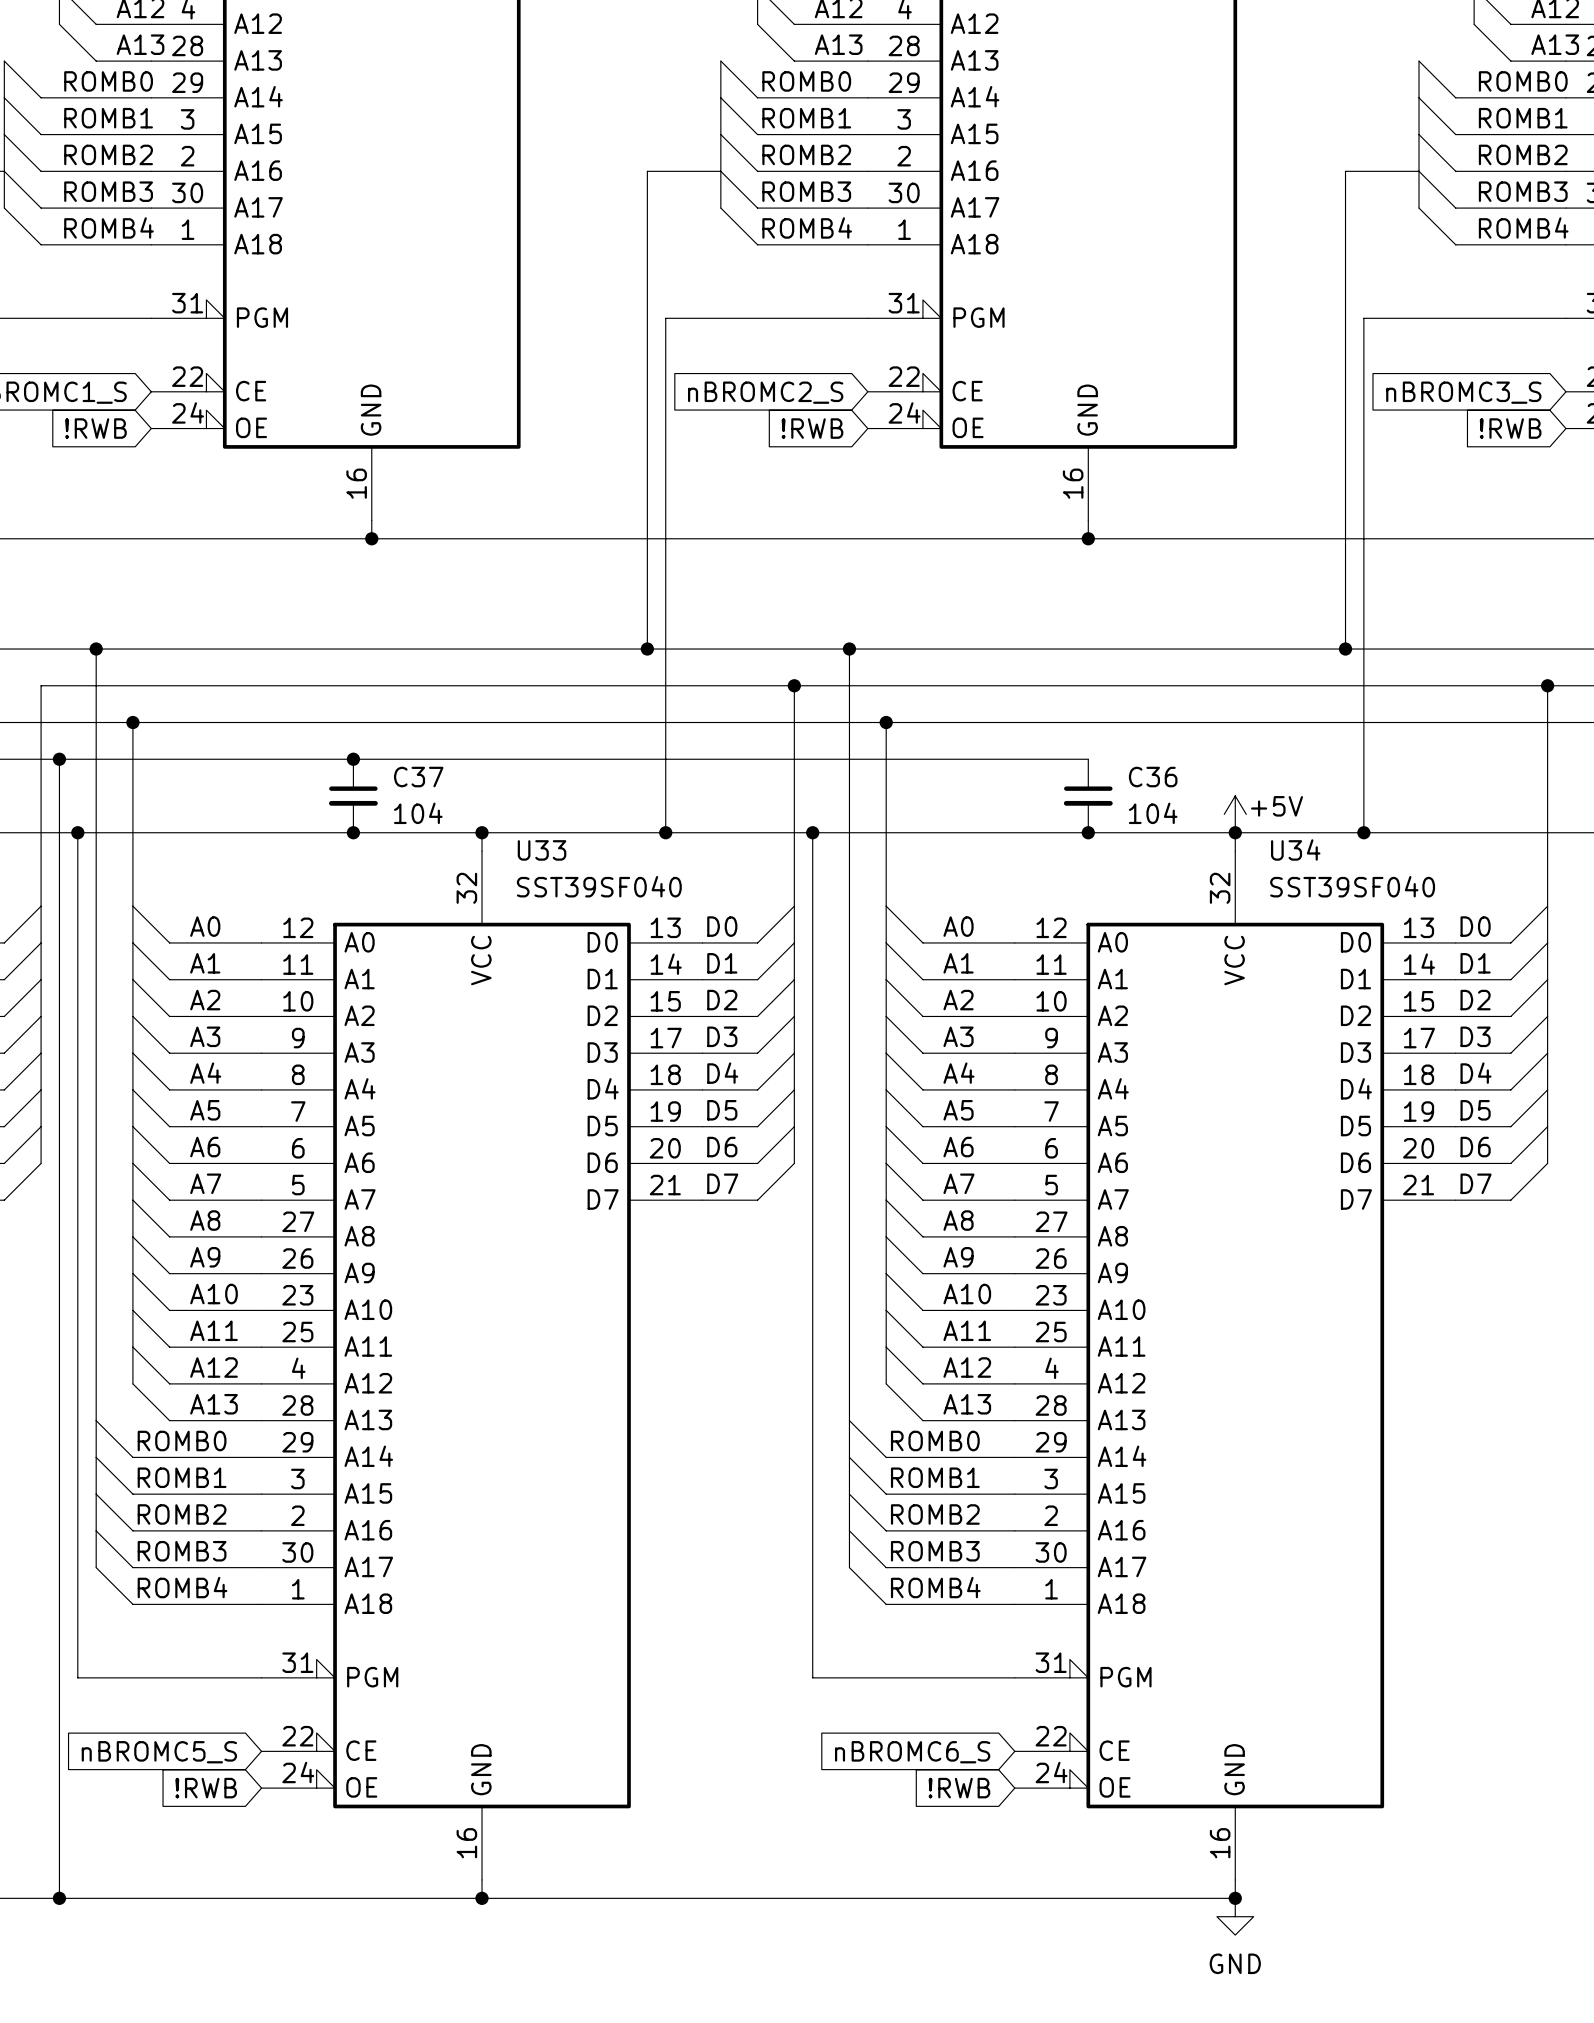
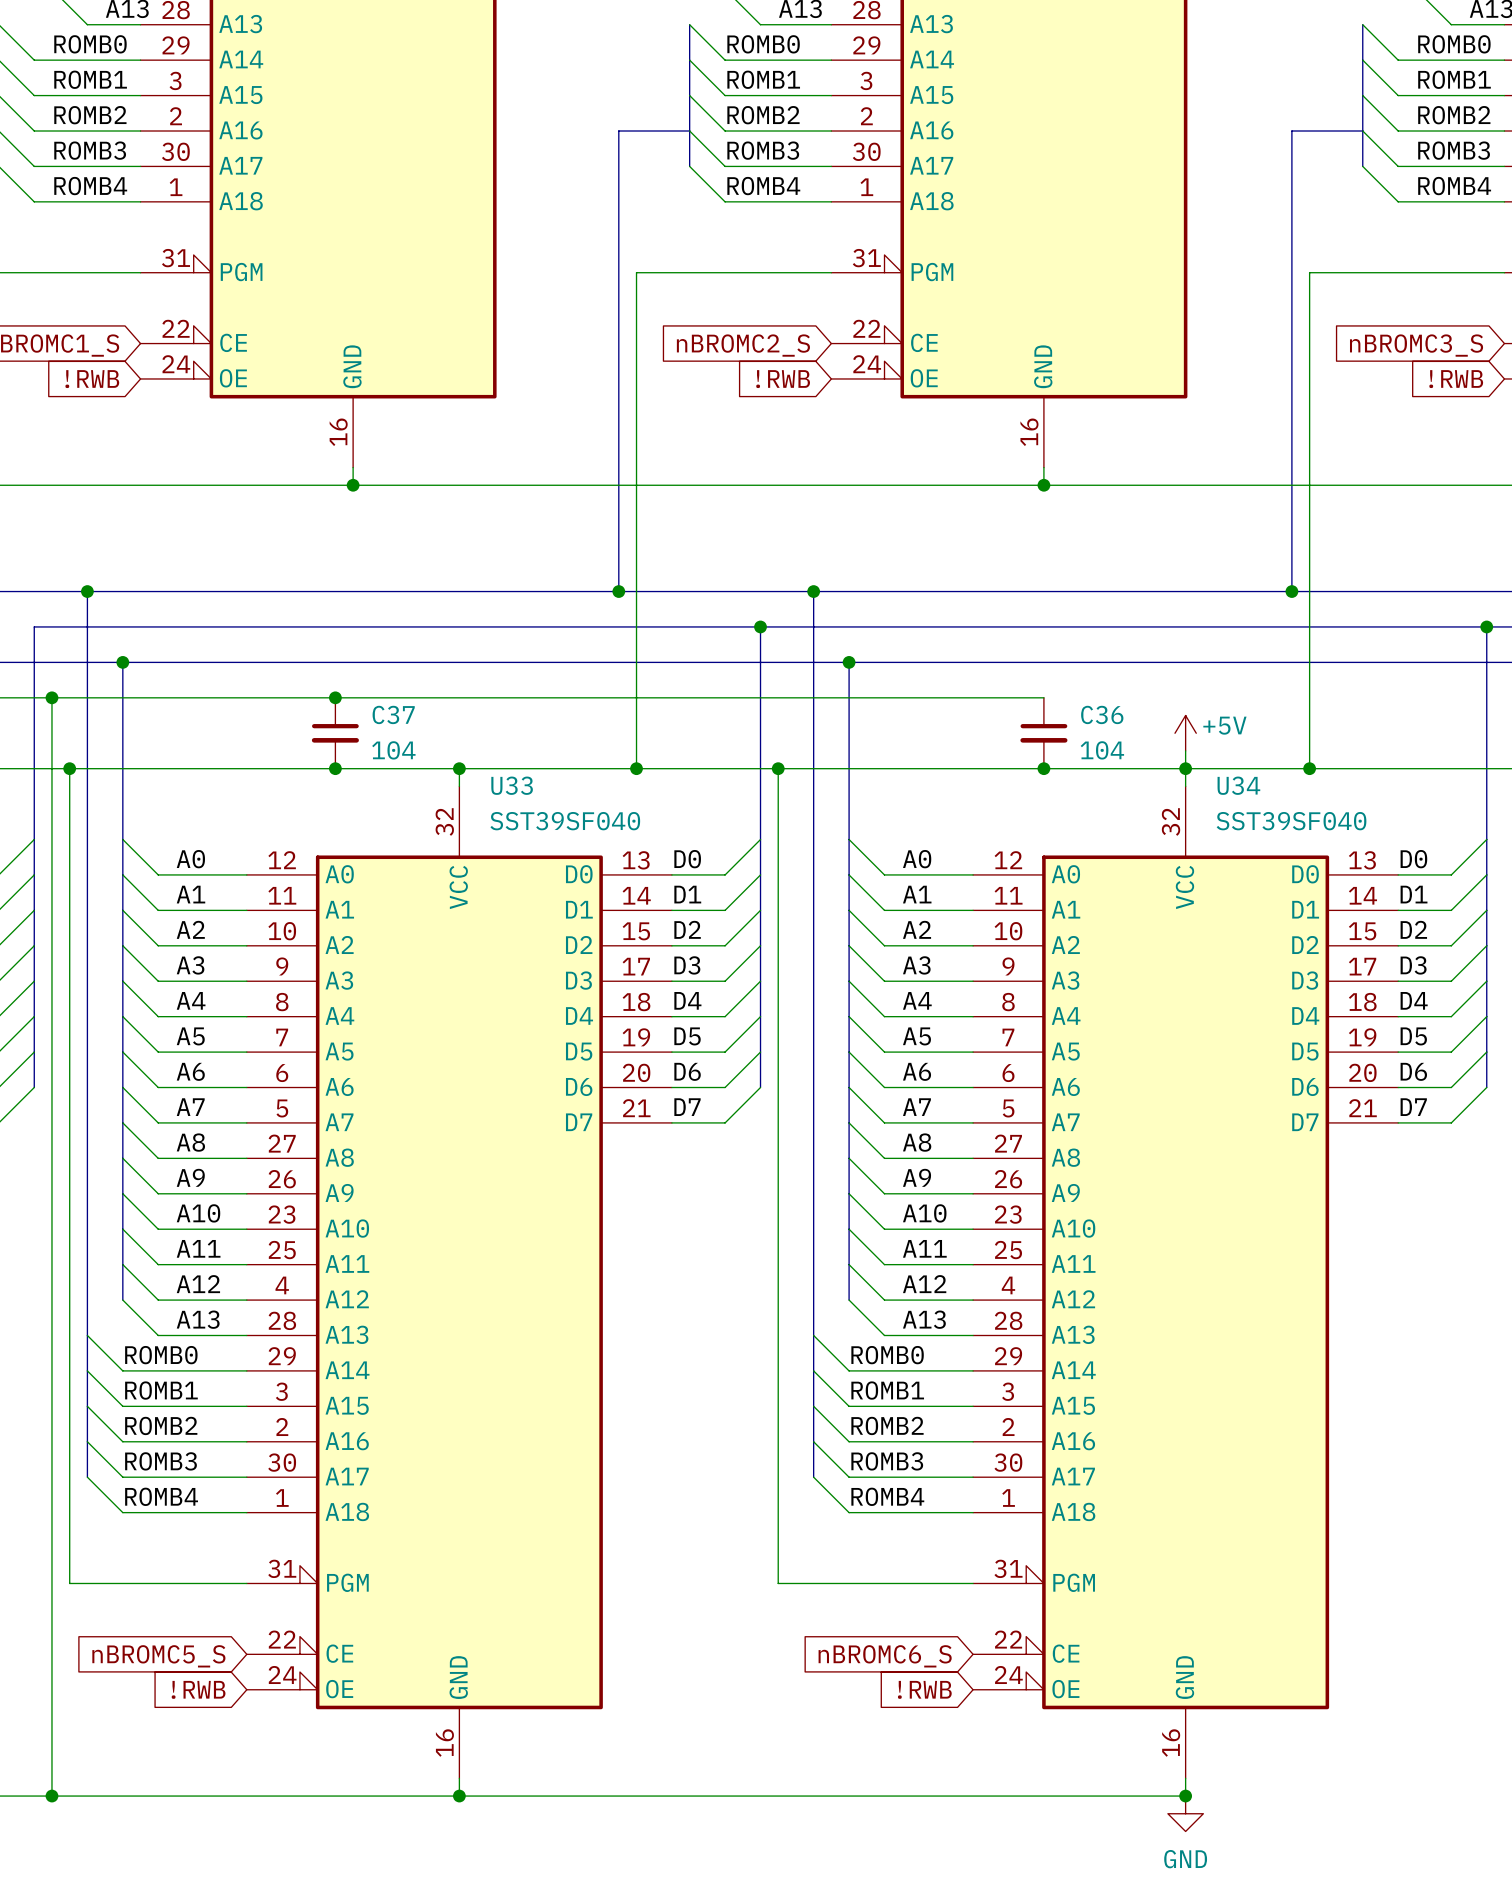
power symbol position: +5V (1235, 814) -> +5V (1185, 733)

